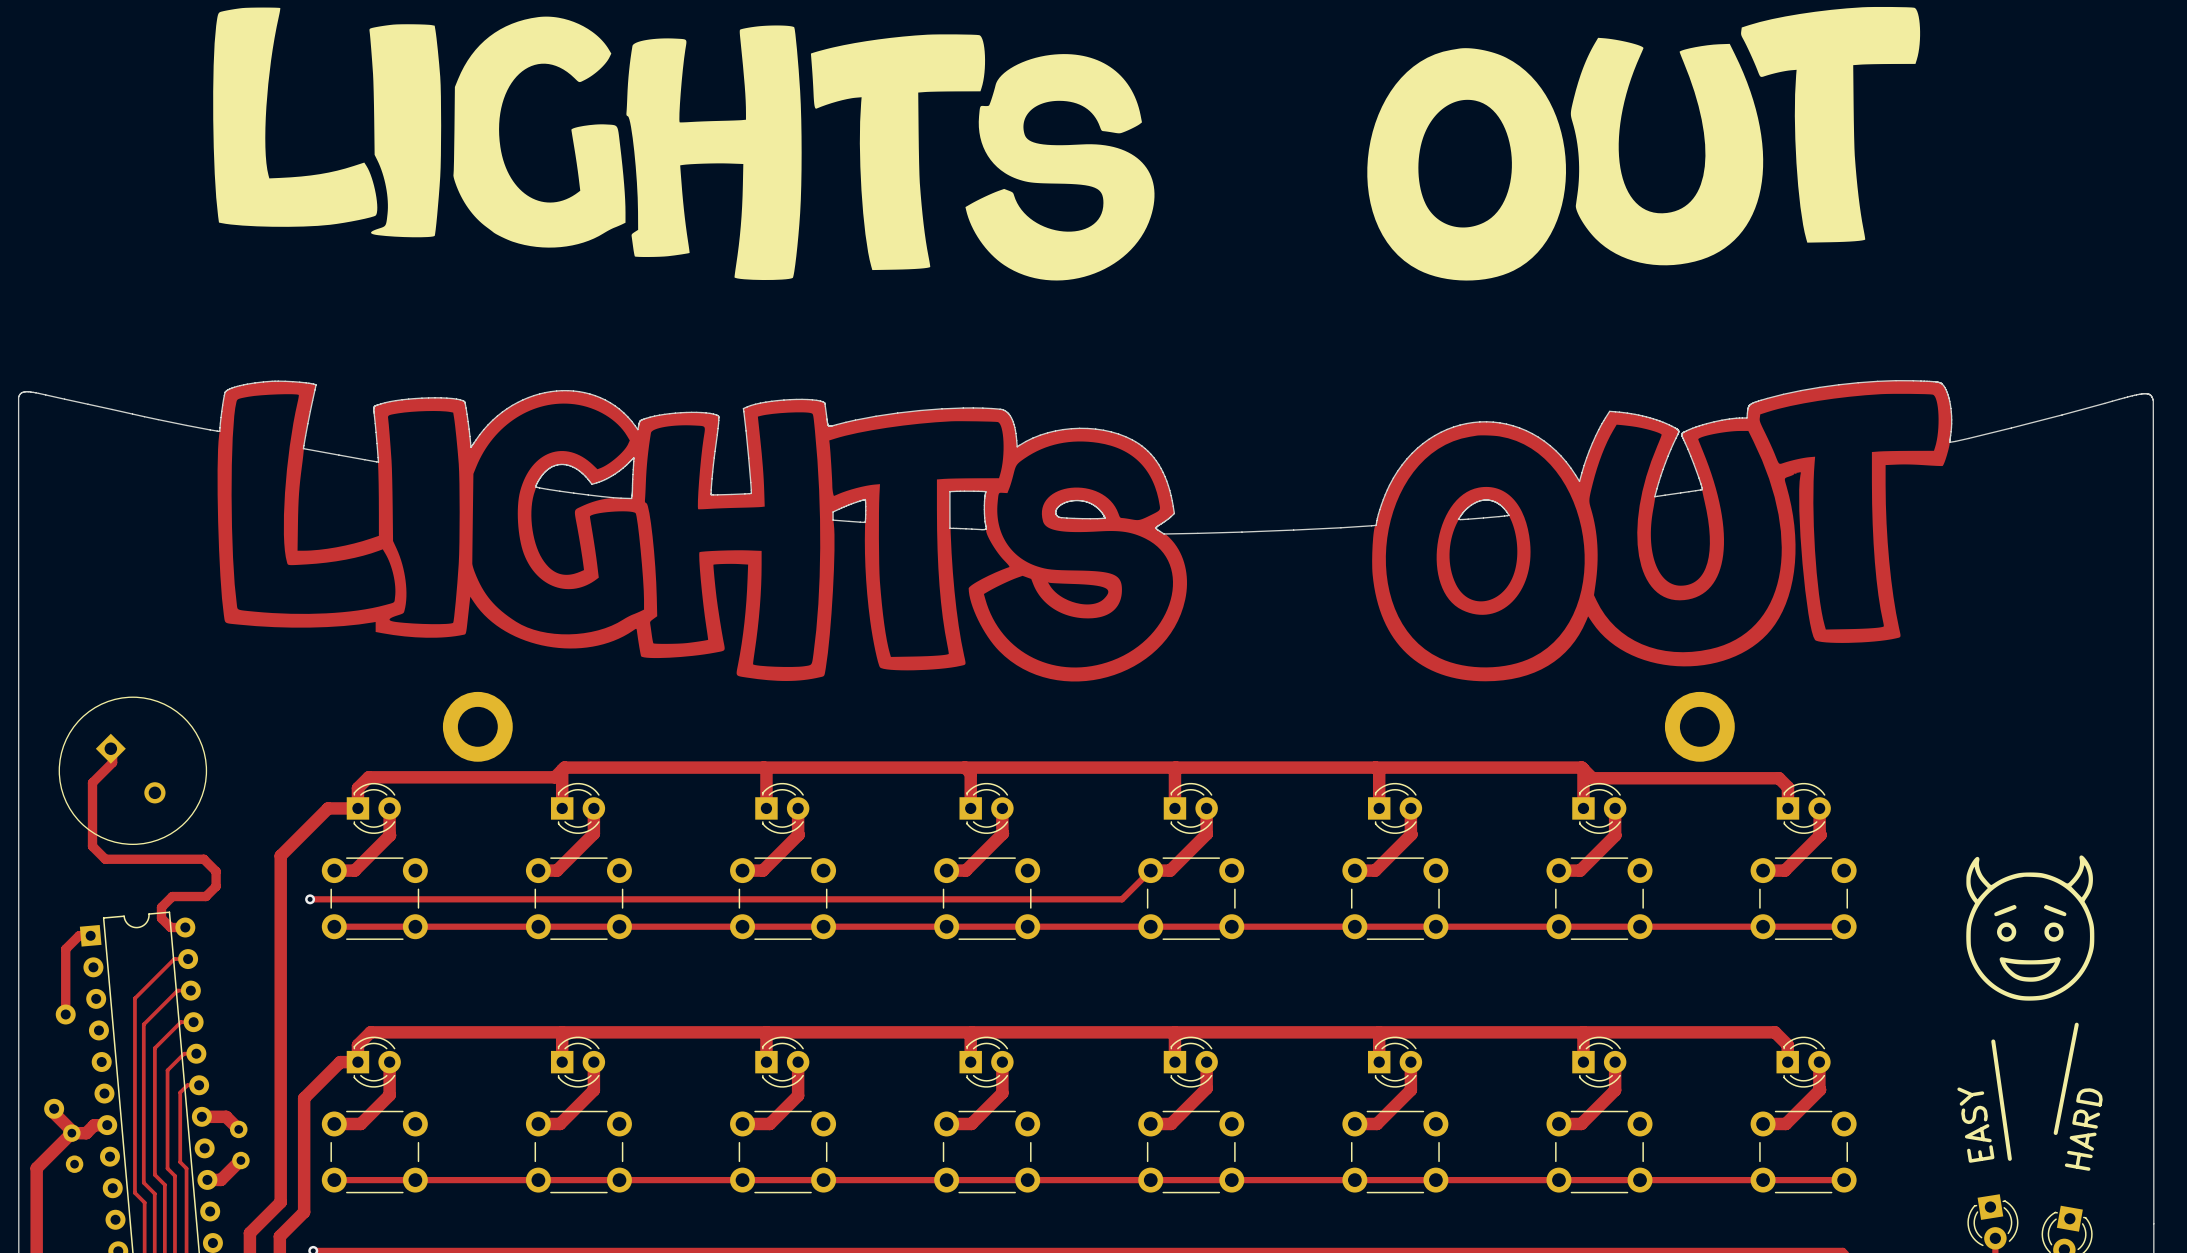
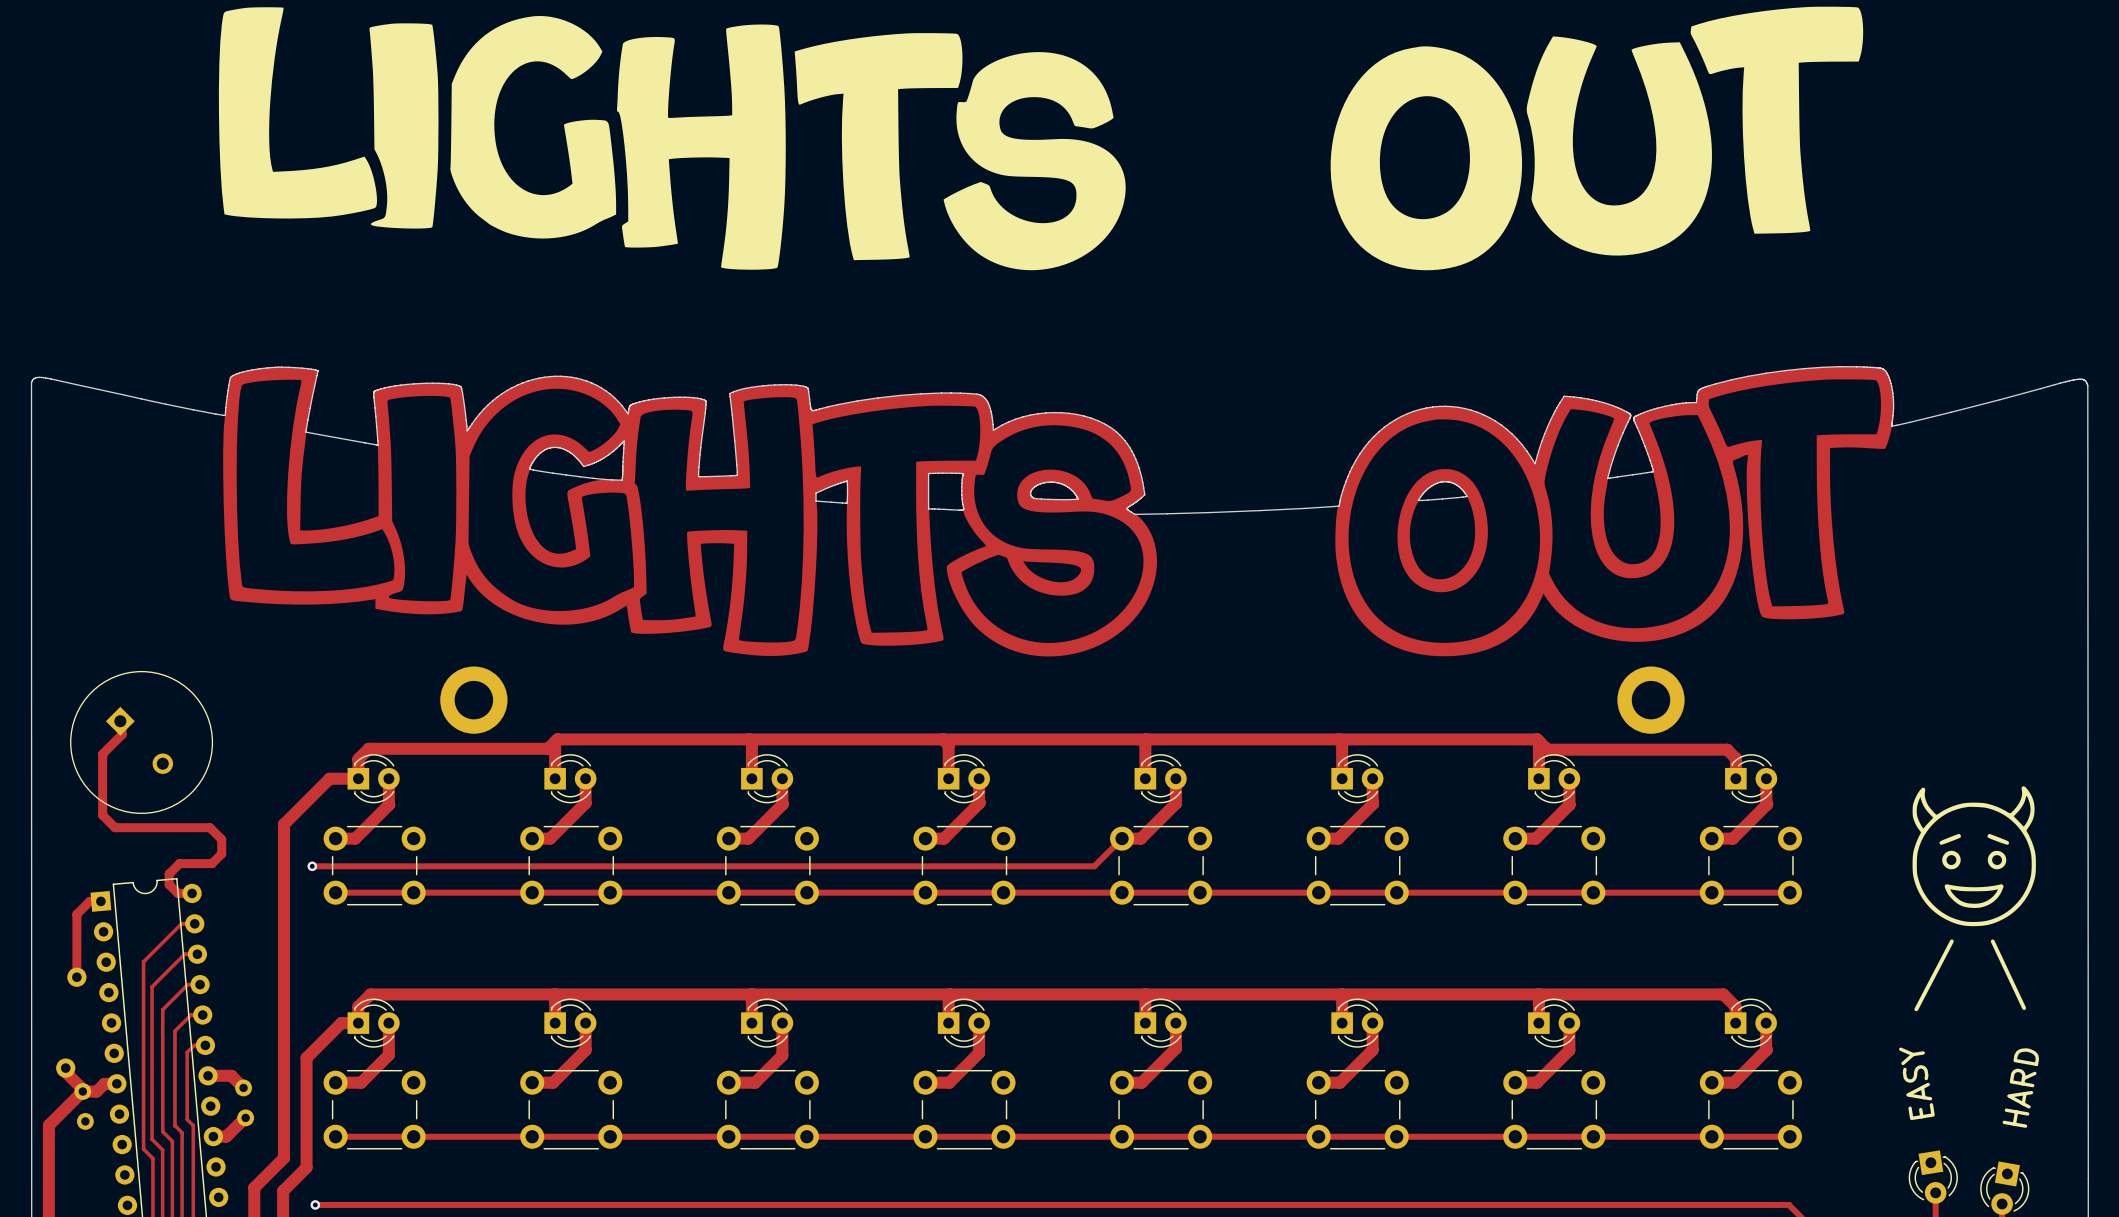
drawing position: (2005, 910) -> (1950, 839)
drawing position: (2055, 910) -> (1998, 839)
drawing position: (2030, 928) -> (1974, 856)
drawing position: (2006, 932) -> (1951, 860)
drawing position: (2053, 932) -> (1997, 860)
drawing position: (2030, 969) -> (1974, 896)
line: none -> (1951, 941) (1916, 1009)
line: none -> (1992, 941) (2024, 1008)
line: (2076, 1024) (2055, 1133) -> none
line: (1993, 1041) (2009, 1158) -> none

